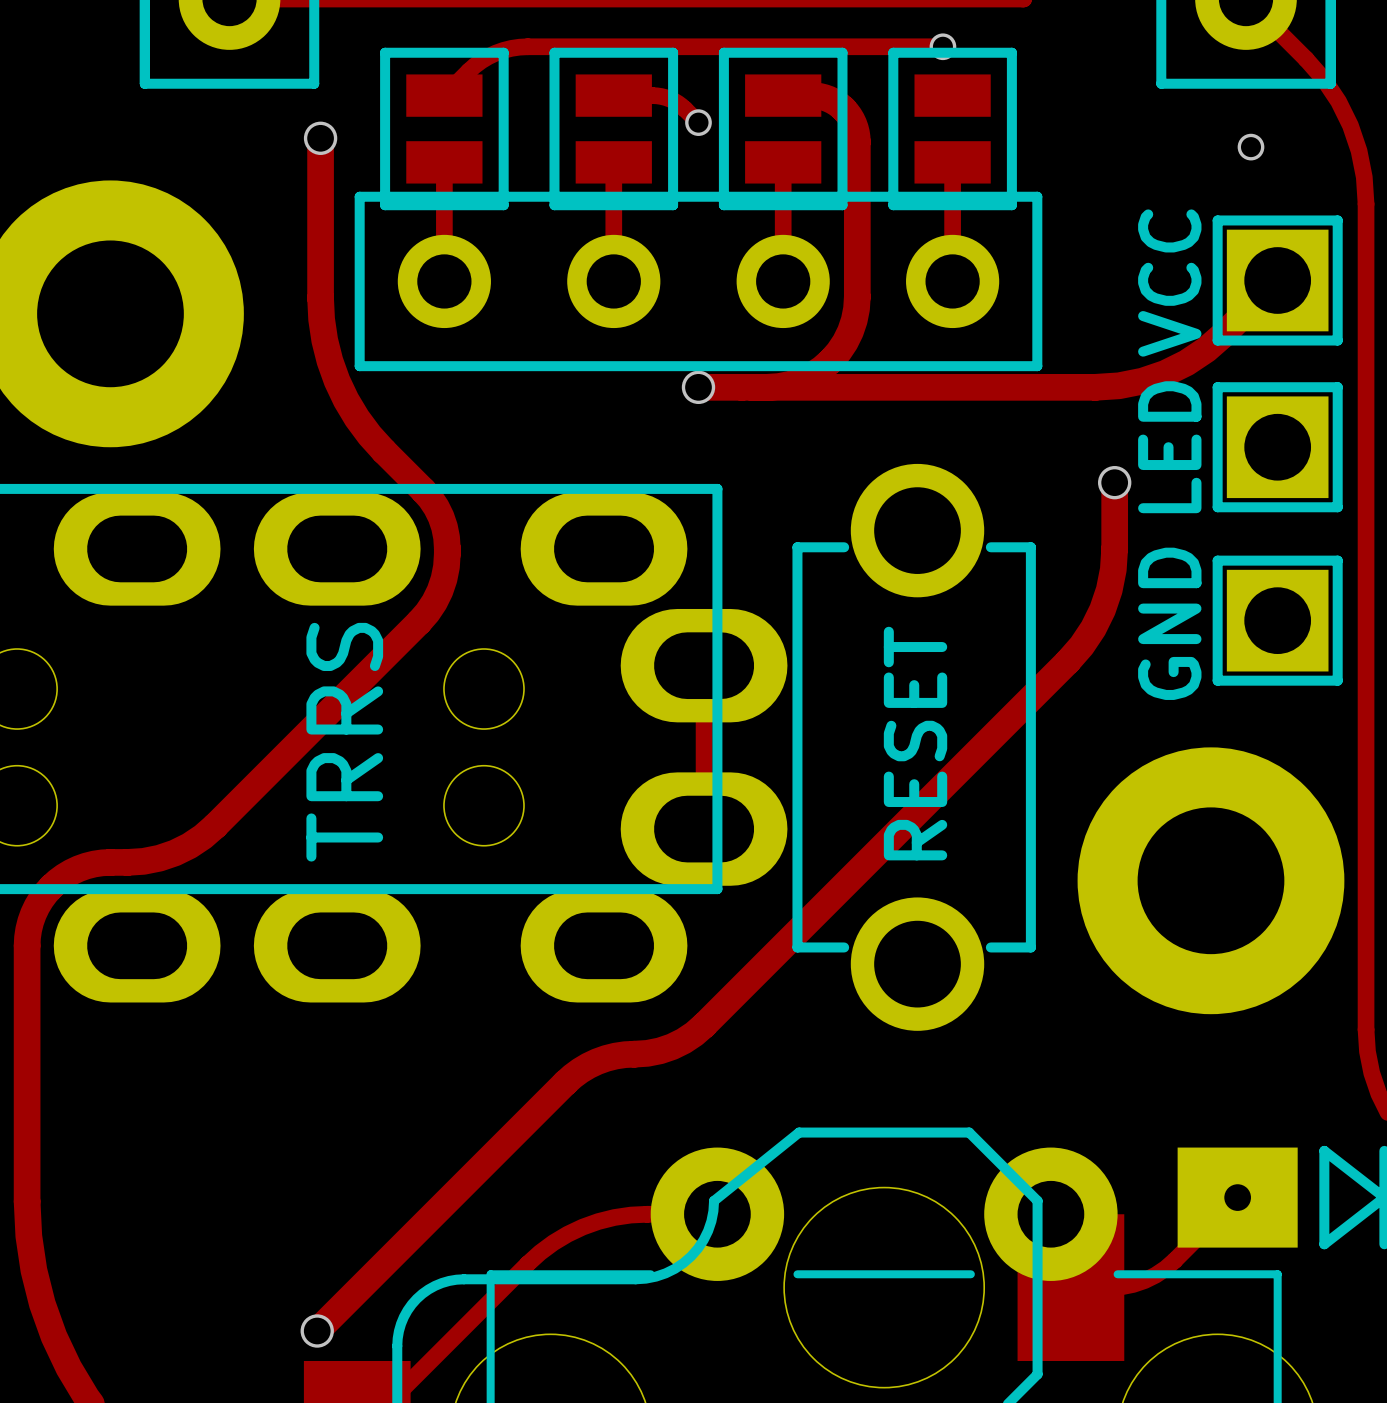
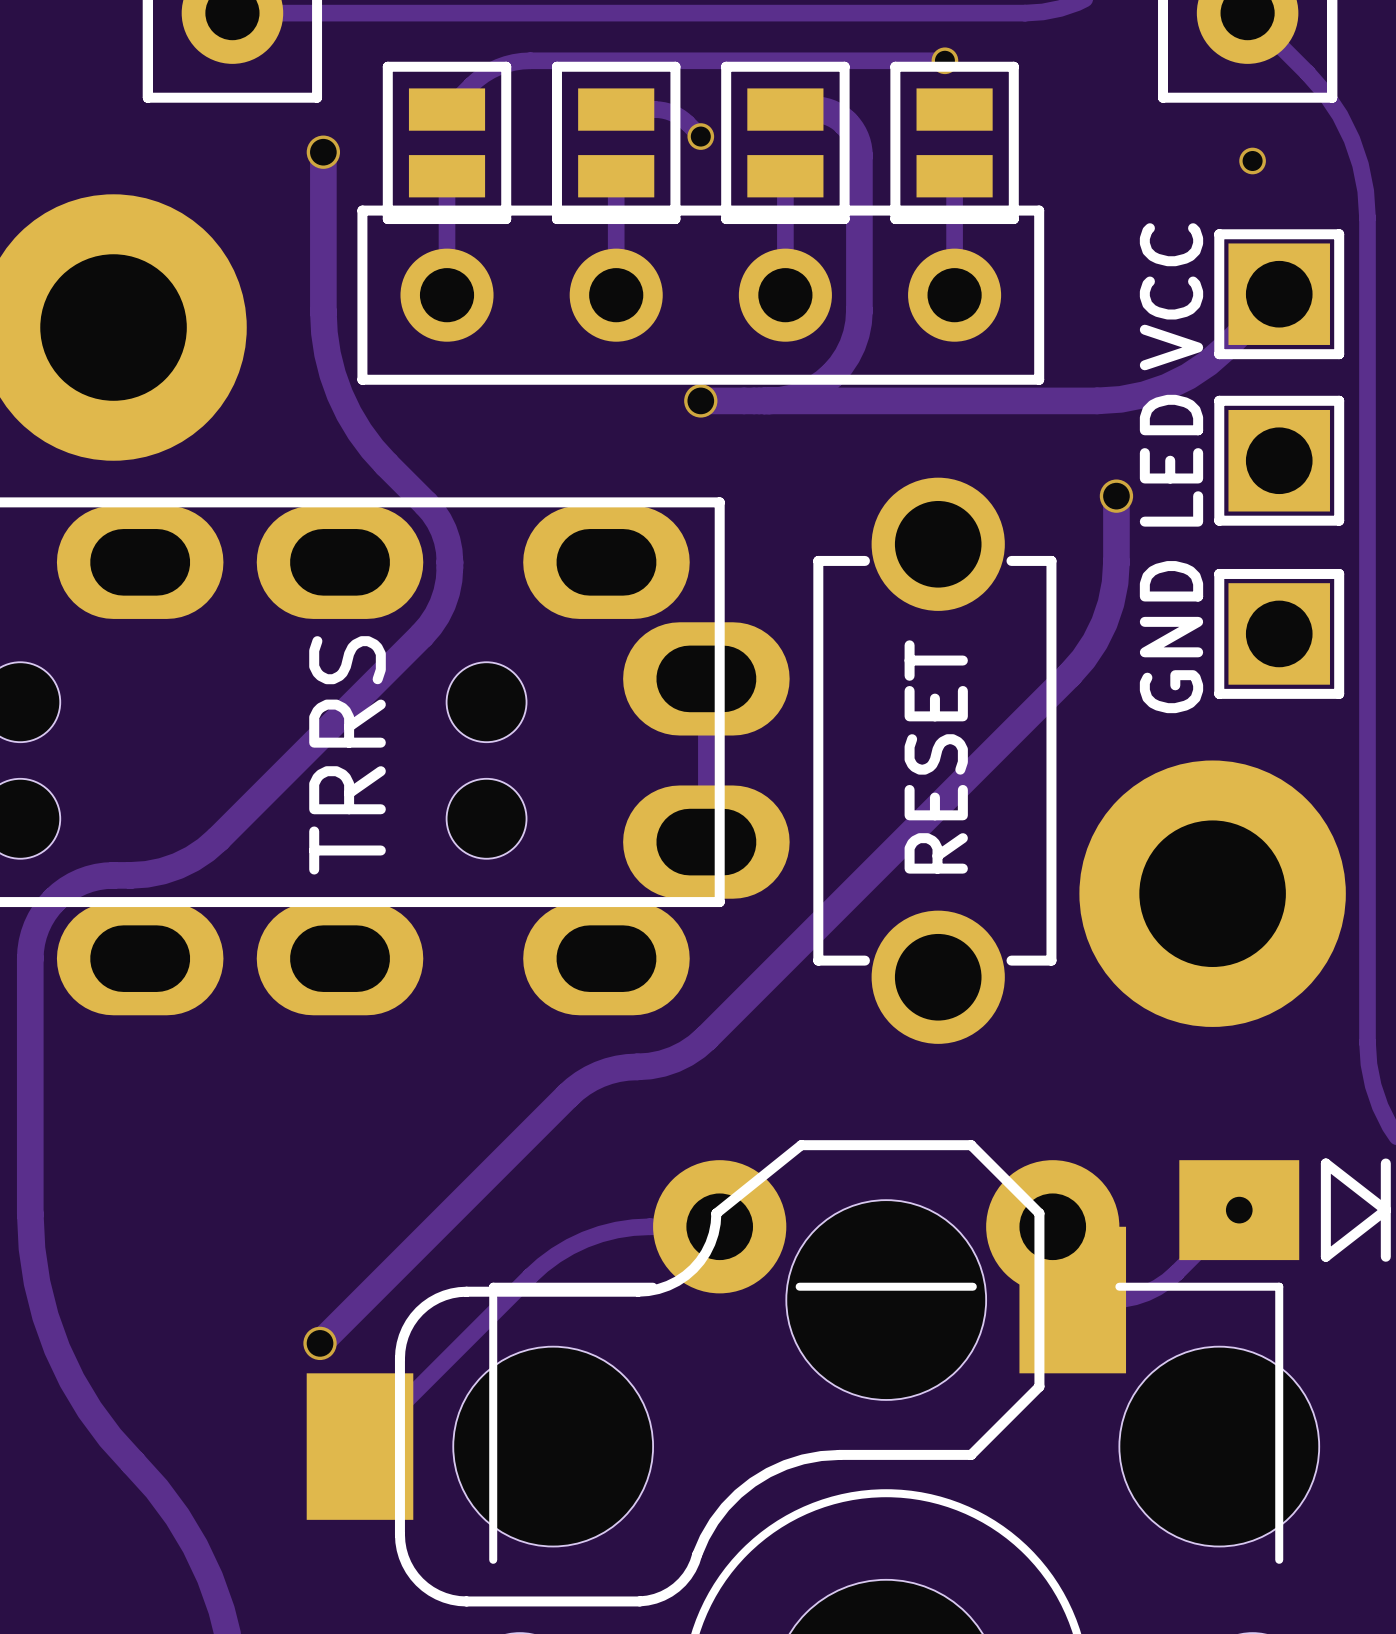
part position: (914, 747) -> (934, 760)

